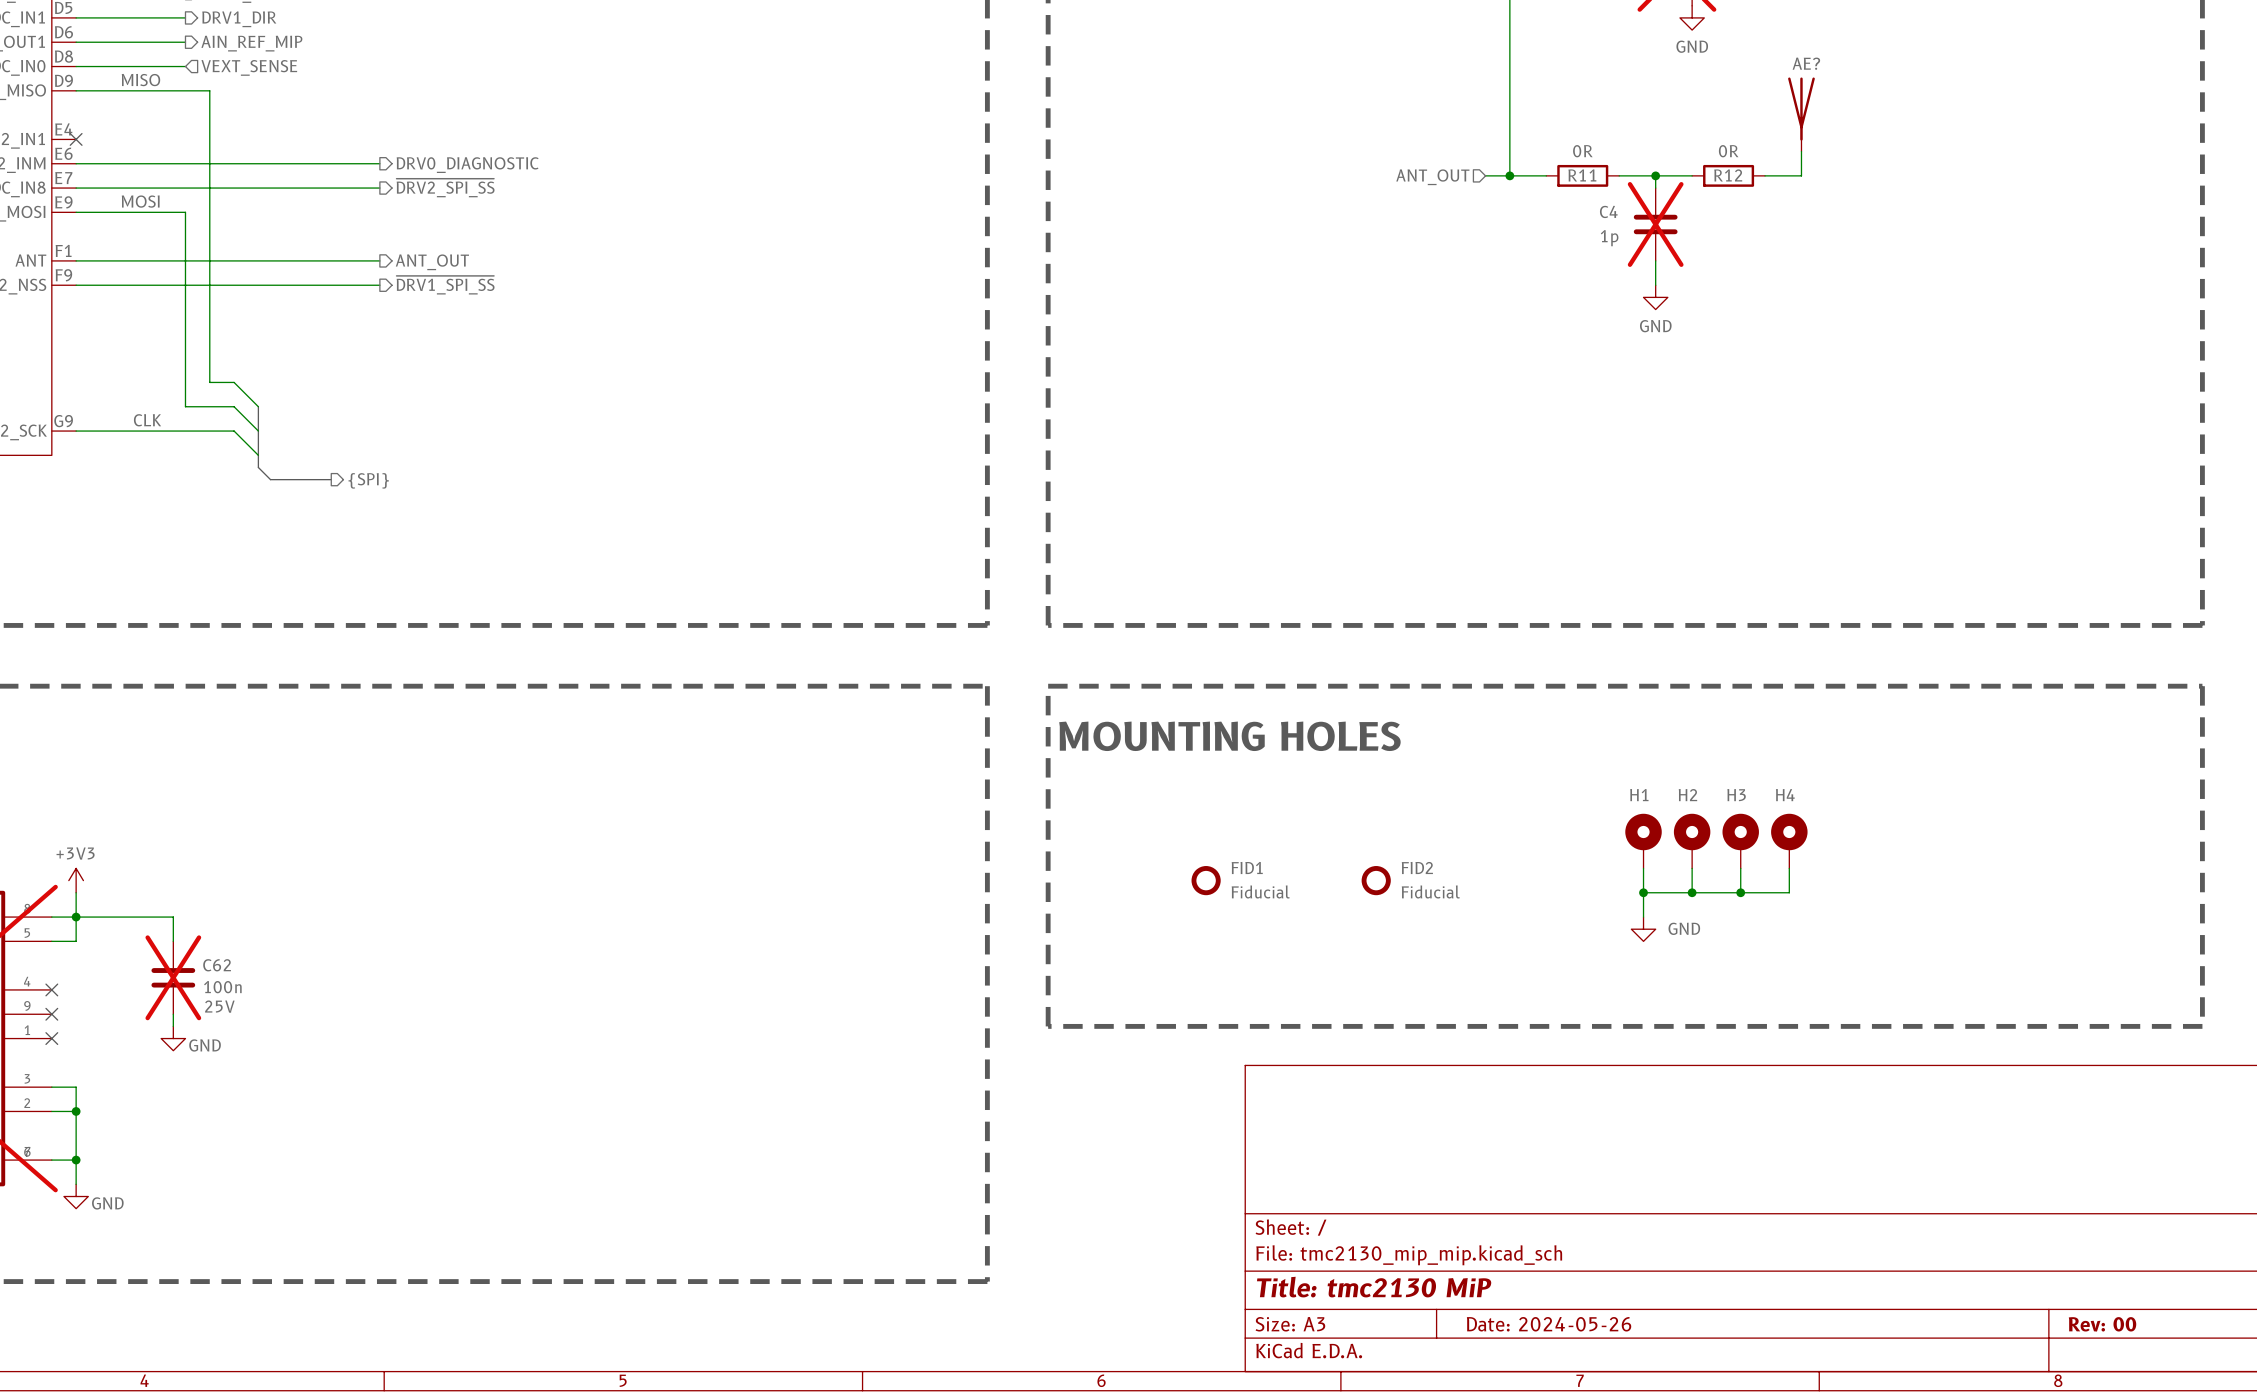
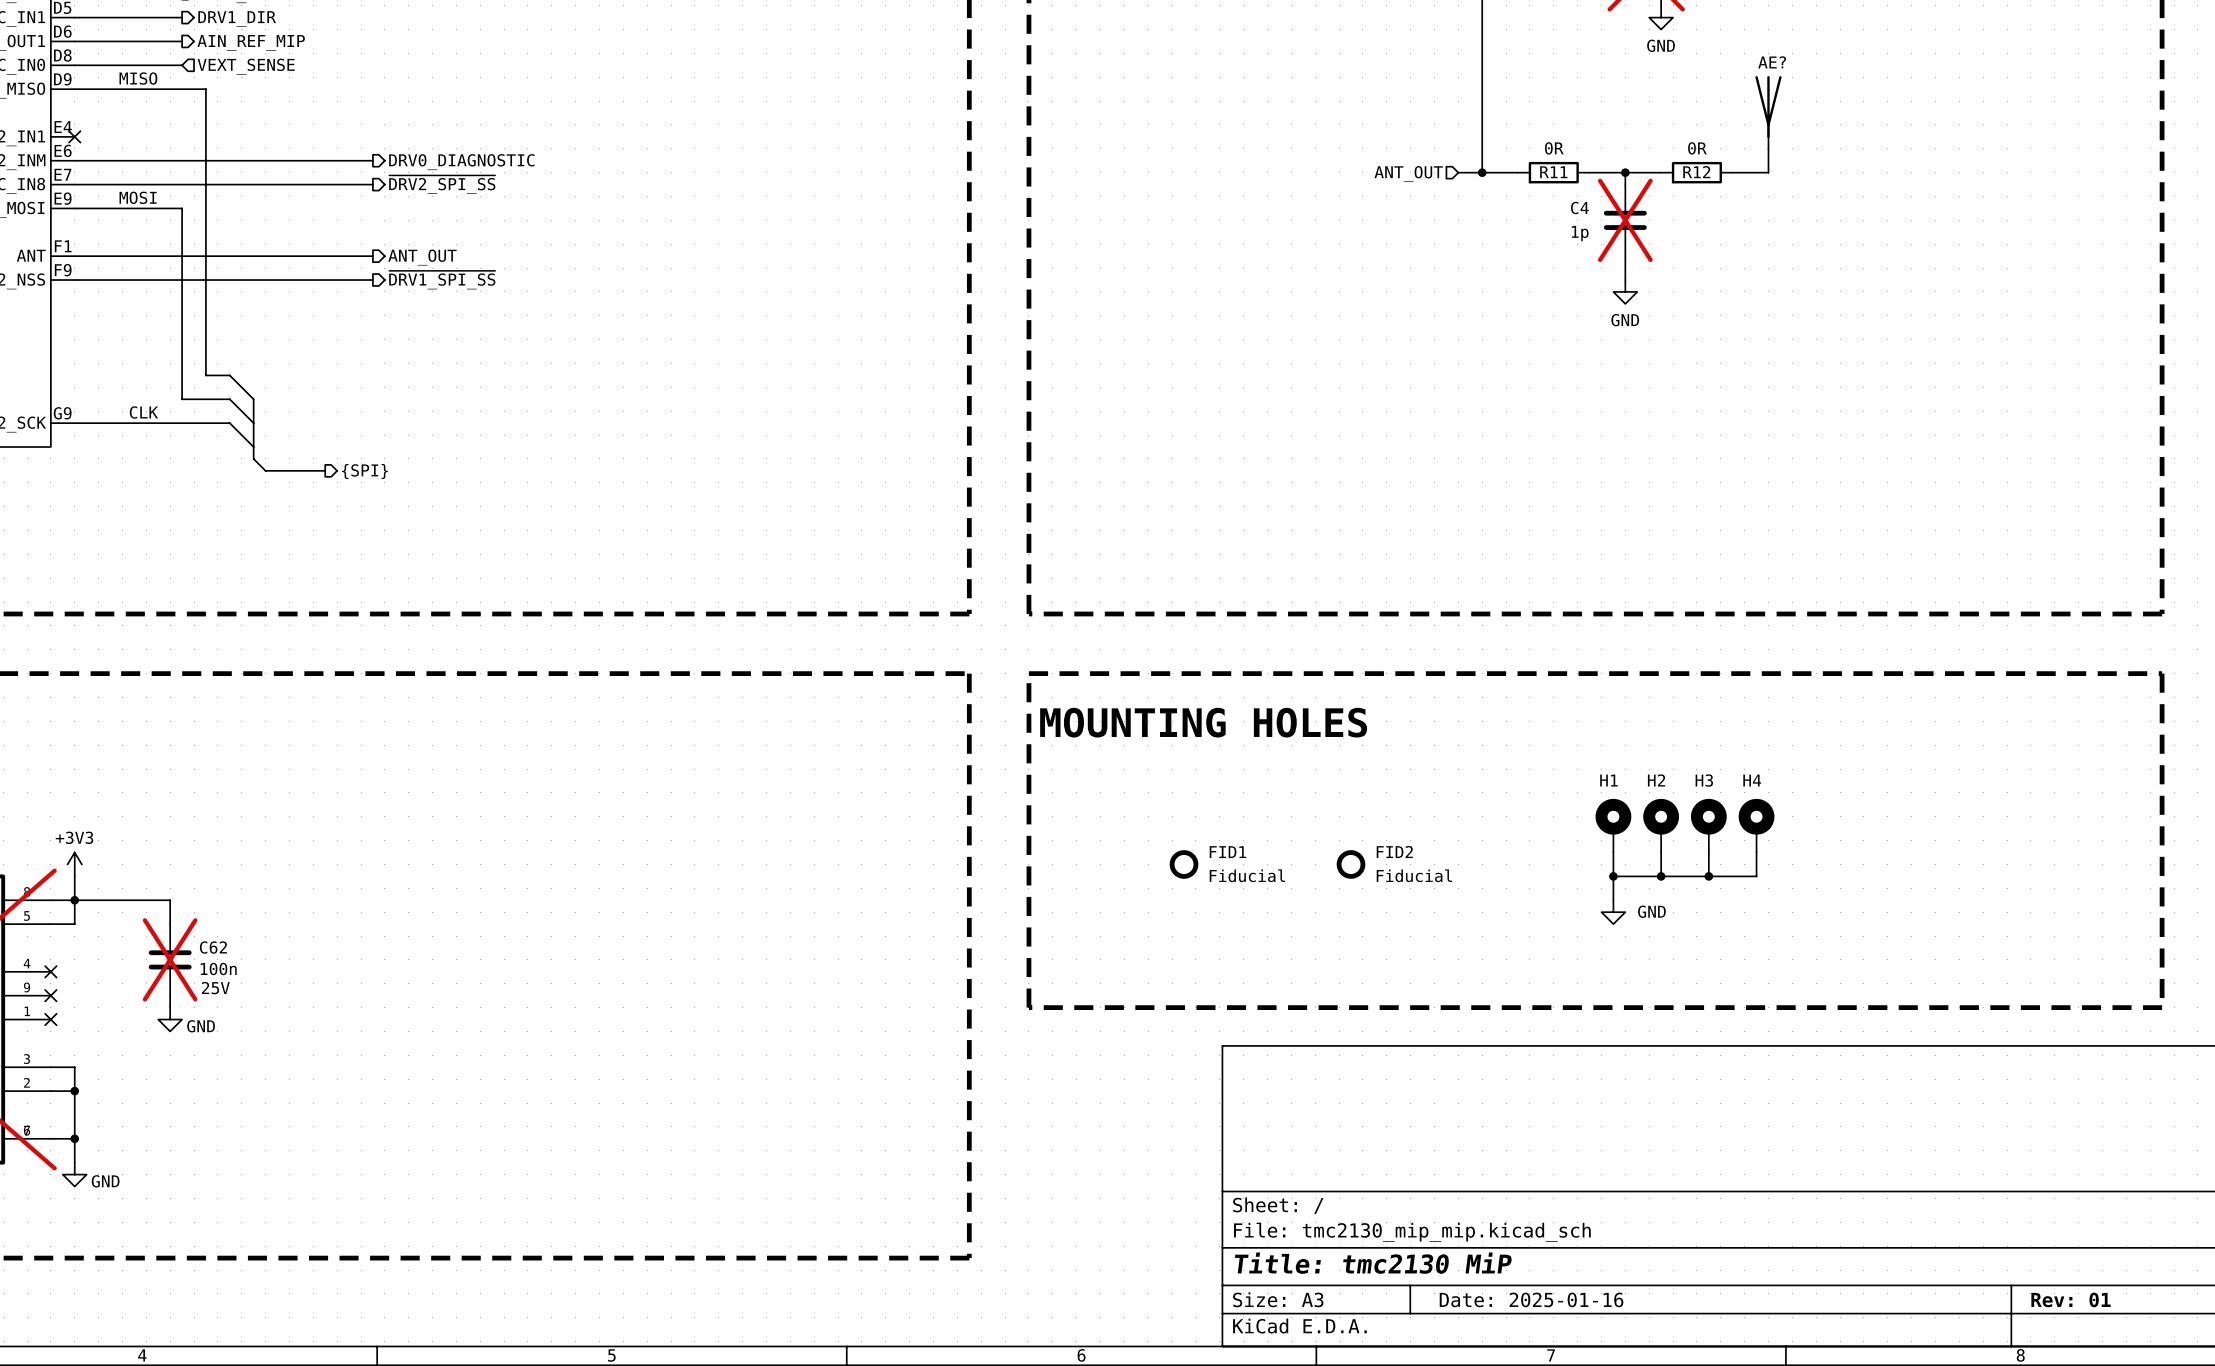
title block: Date: 2024-05-26 (1549, 1324) -> Date: 2025-01-16 (1531, 1299)
title block: Rev: 00 (2102, 1324) -> Rev: 01 (2071, 1299)

